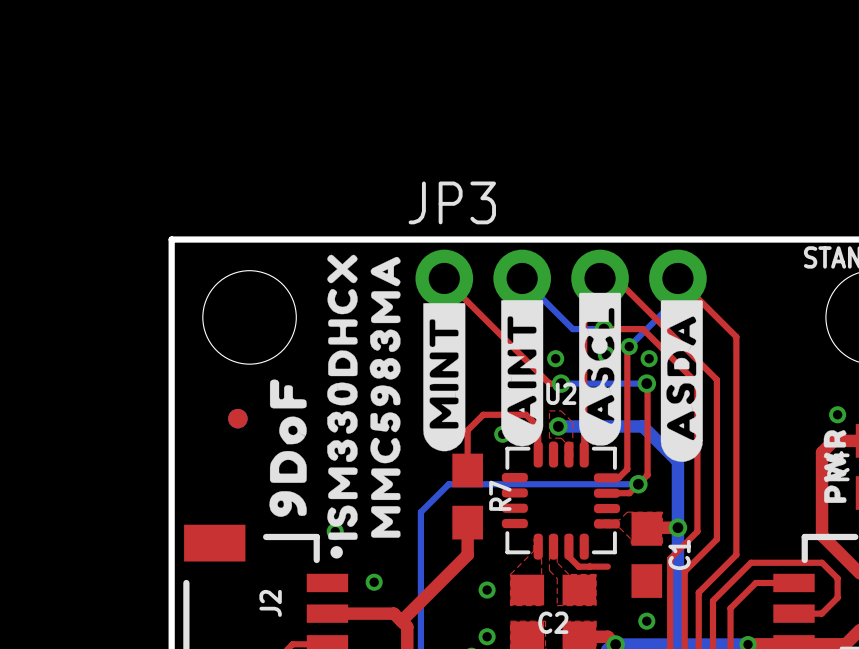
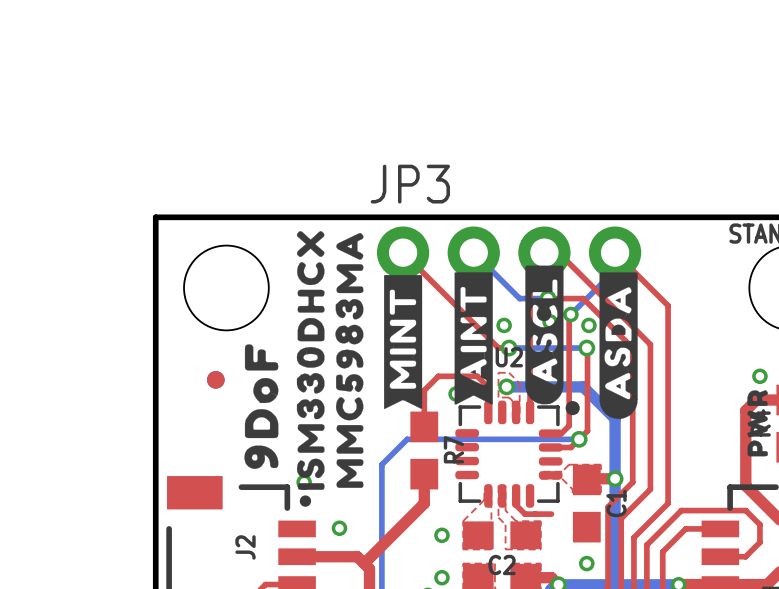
drawing shape: [501, 300, 544, 447] -> [454, 272, 493, 405]
drawing shape: [423, 303, 466, 452] -> [384, 274, 423, 410]
drawing: none -> [565, 401, 580, 416]

